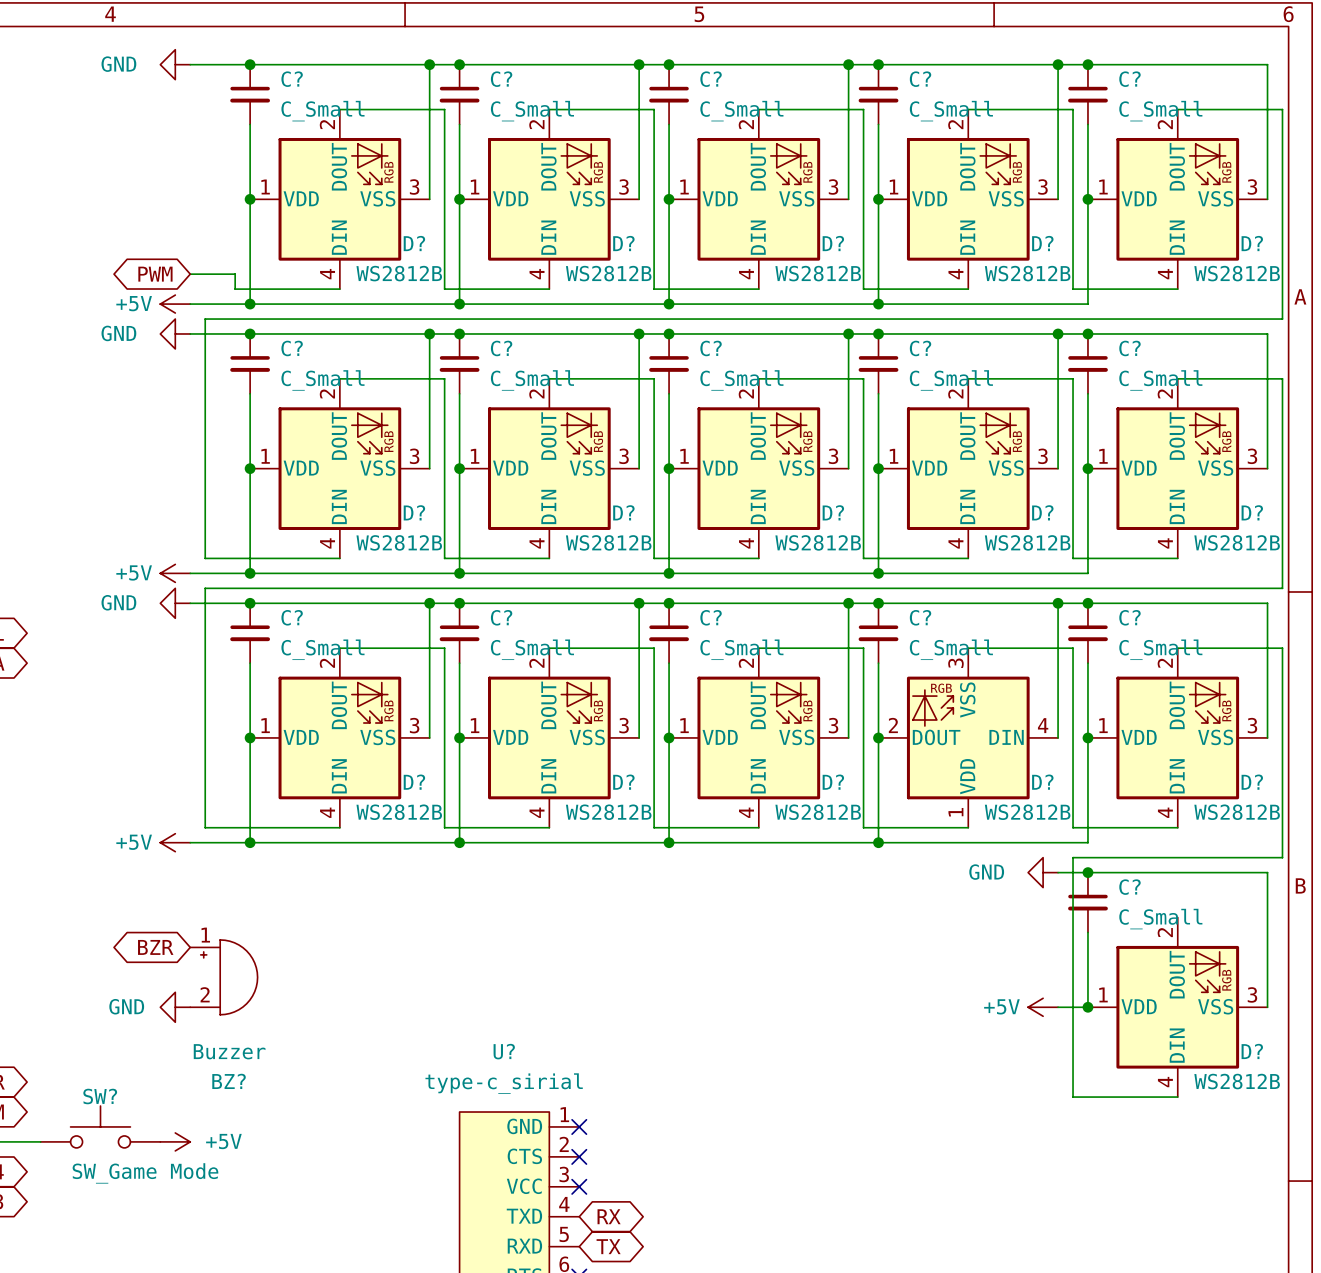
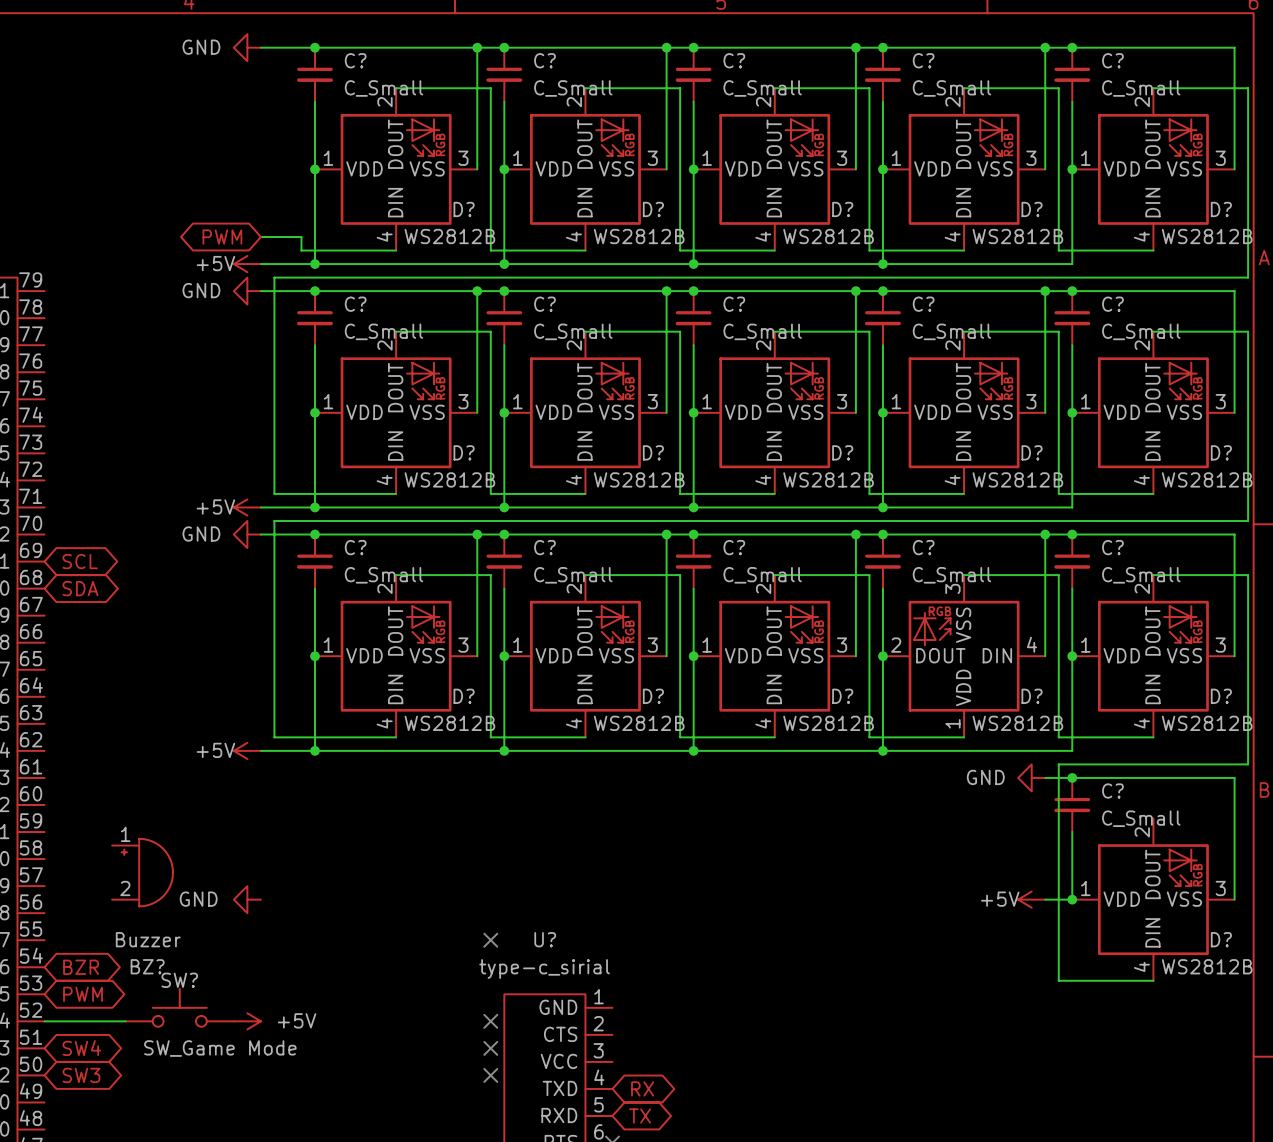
global label: BZR (155, 947) -> none
BZ? position: (223, 977) -> (142, 872)
no-connect mark: none -> (490, 940)
no-connect mark: (579, 1126) -> none
no-connect mark: none -> (490, 1021)
no-connect mark: (579, 1156) -> none
no-connect mark: none -> (490, 1048)
no-connect mark: (579, 1186) -> none
no-connect mark: none -> (490, 1075)

